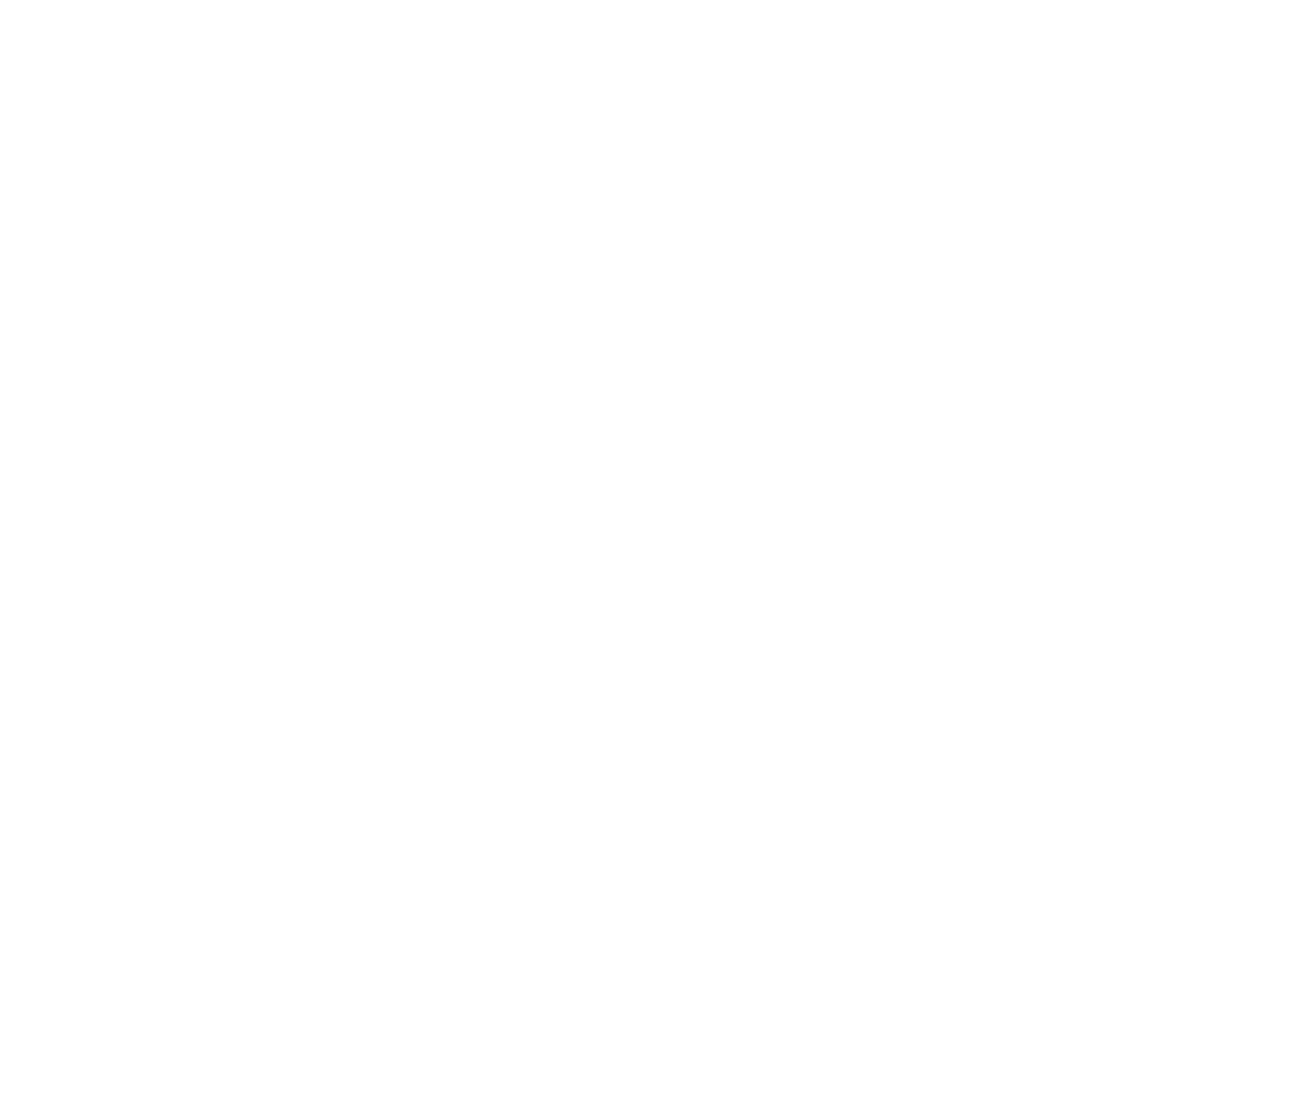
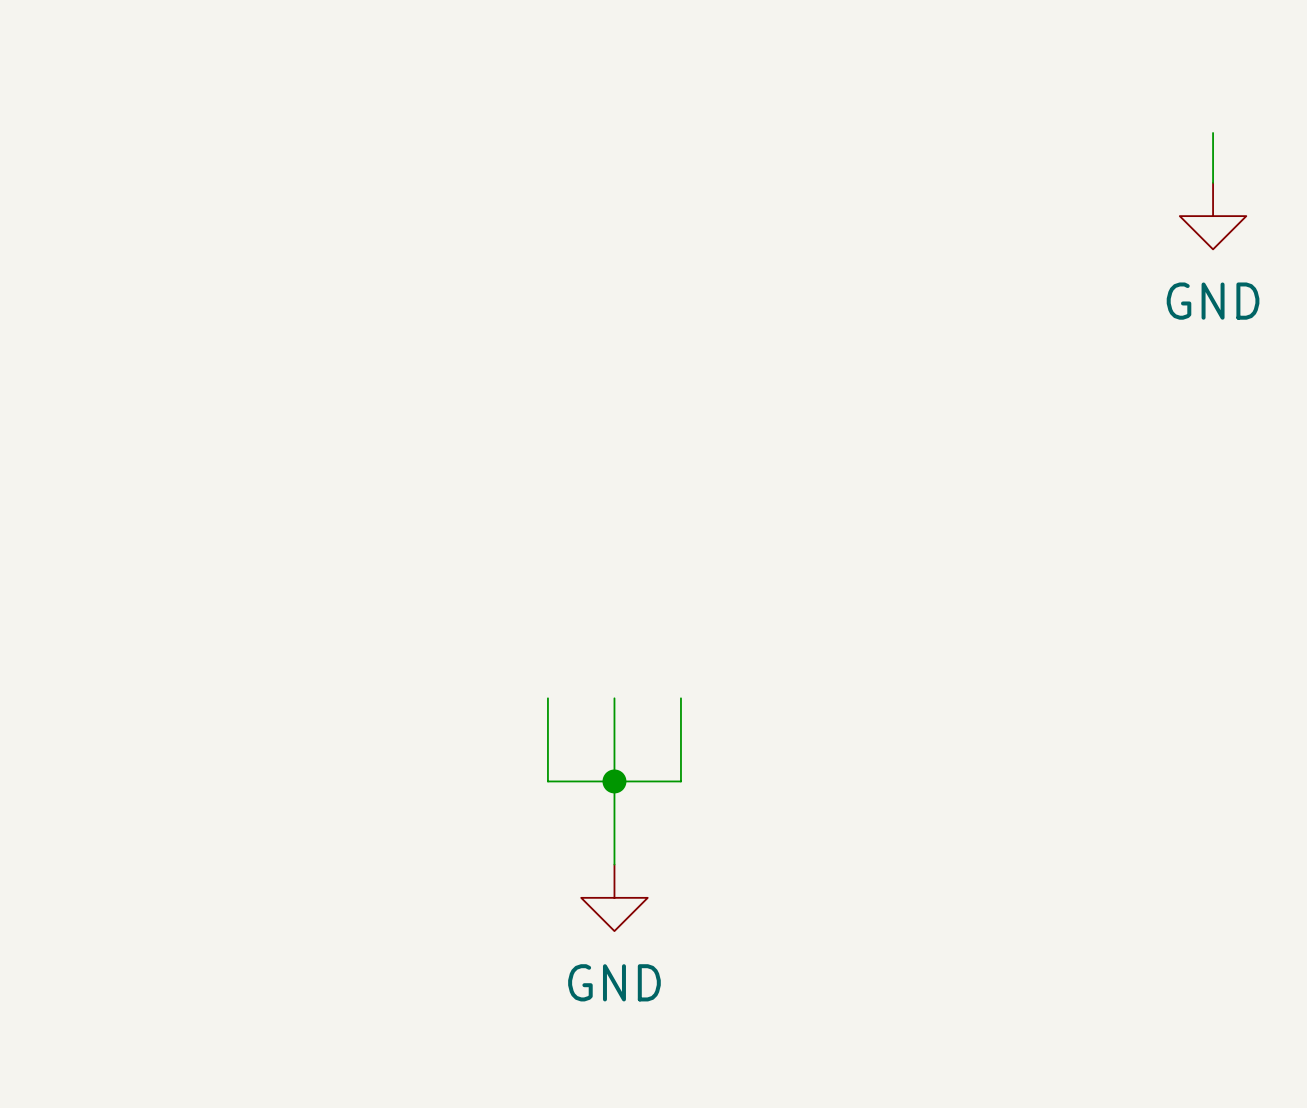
wire: none -> (1213, 132) (1213, 182)
power symbol: none -> GND (1213, 216)
wire: none -> (547, 698) (547, 781) (680, 781) (680, 698)
wire: none -> (614, 698) (614, 864)
junction: none -> (614, 781)
power symbol: none -> GND (614, 897)

